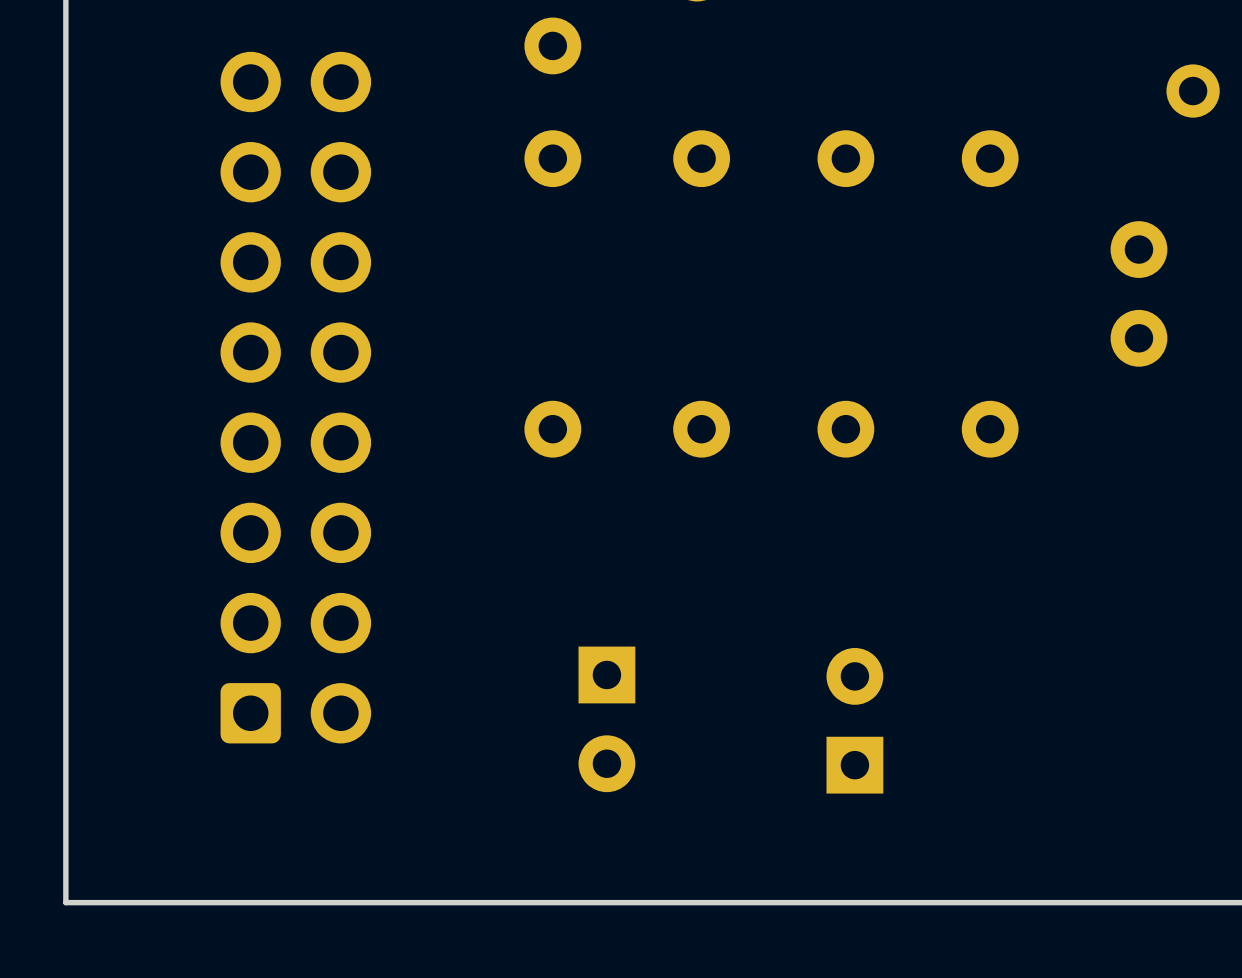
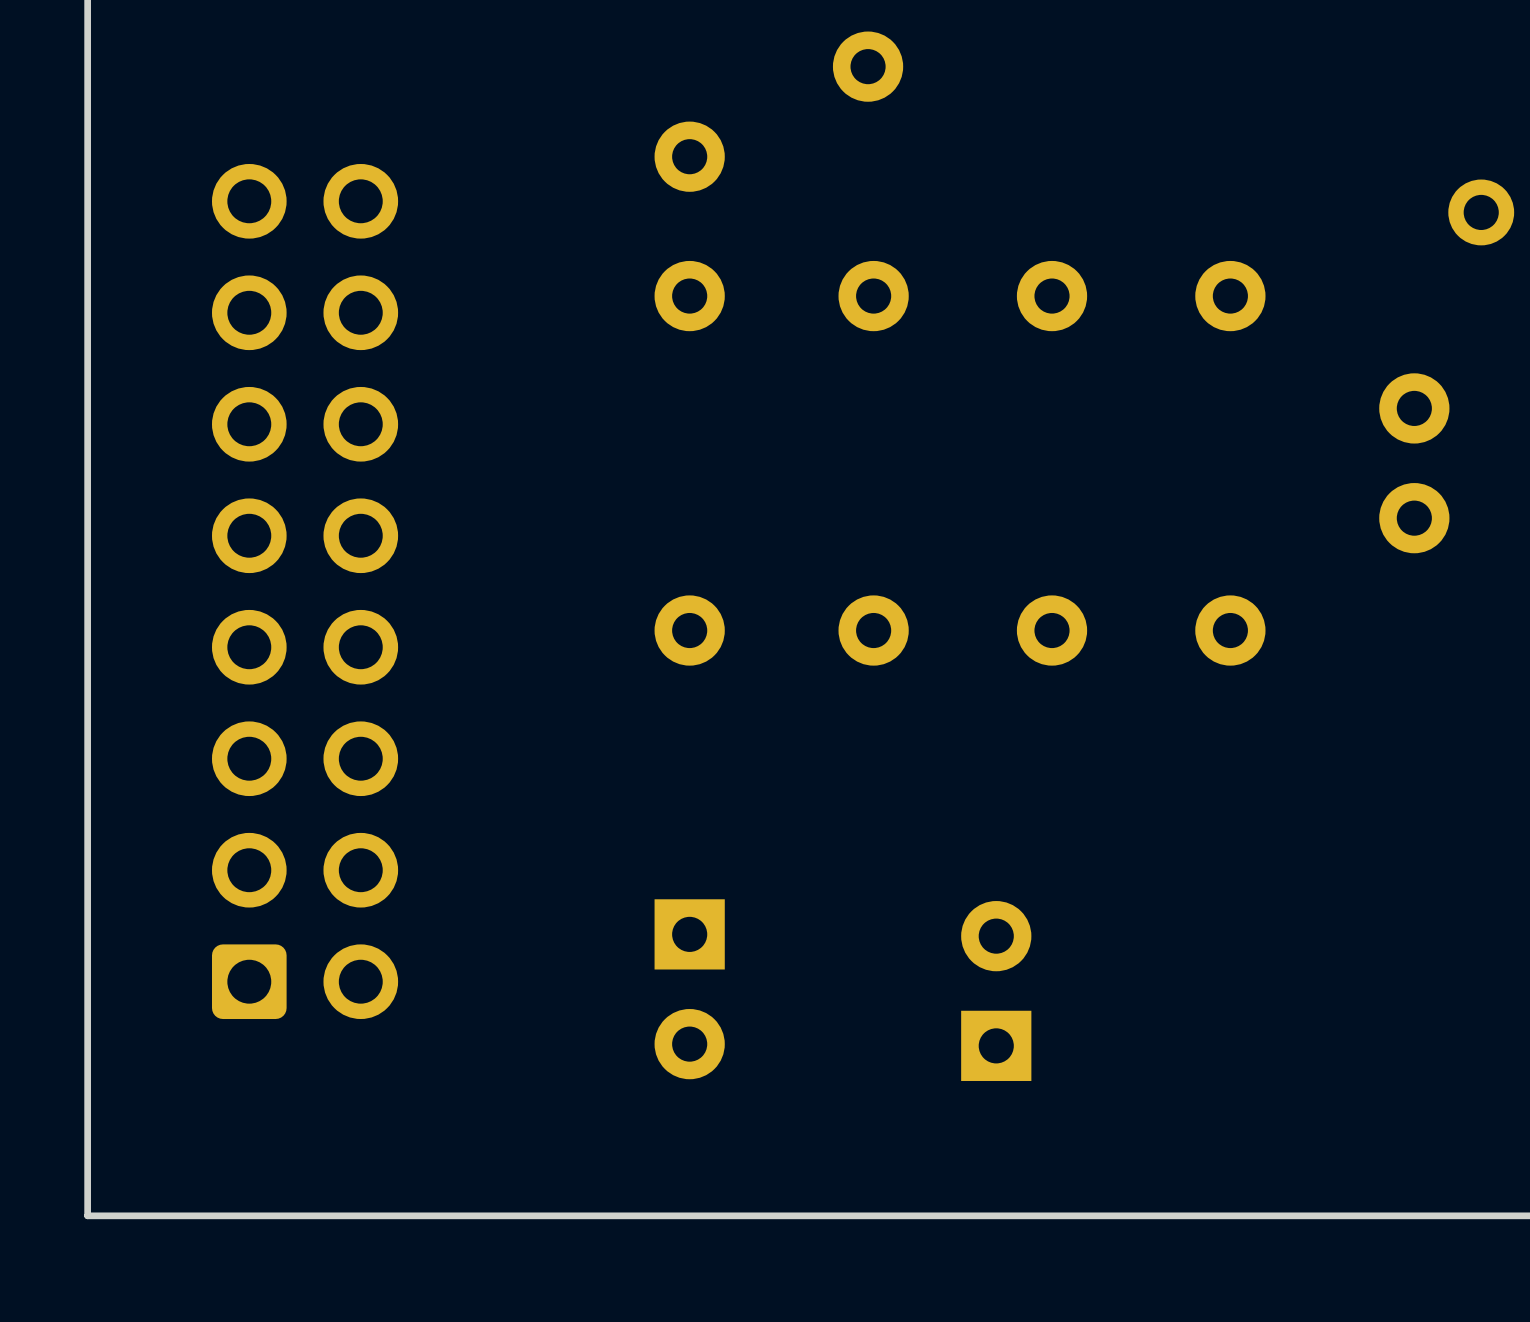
part position: (295, 397) -> (305, 591)
part position: (606, 719) -> (689, 989)
part position: (854, 720) -> (996, 991)

